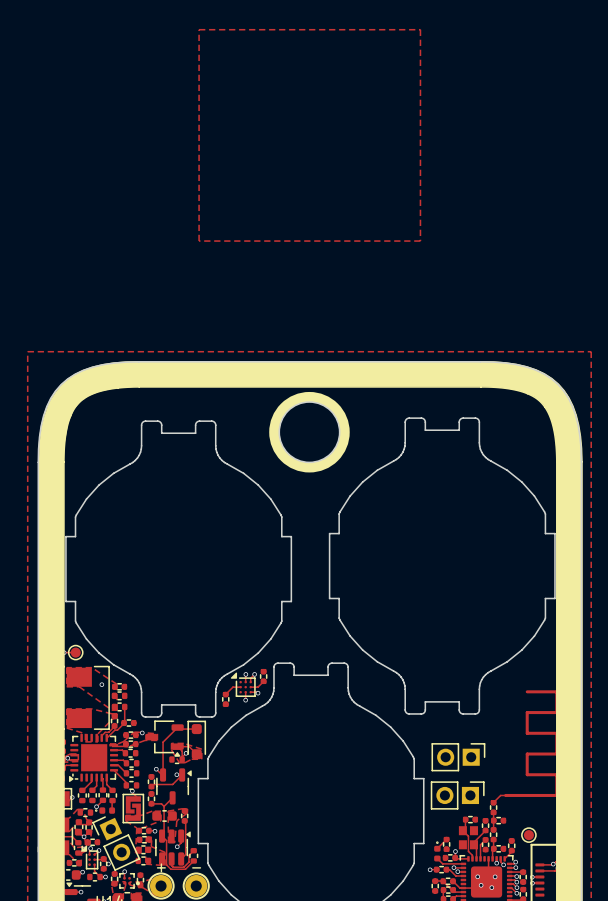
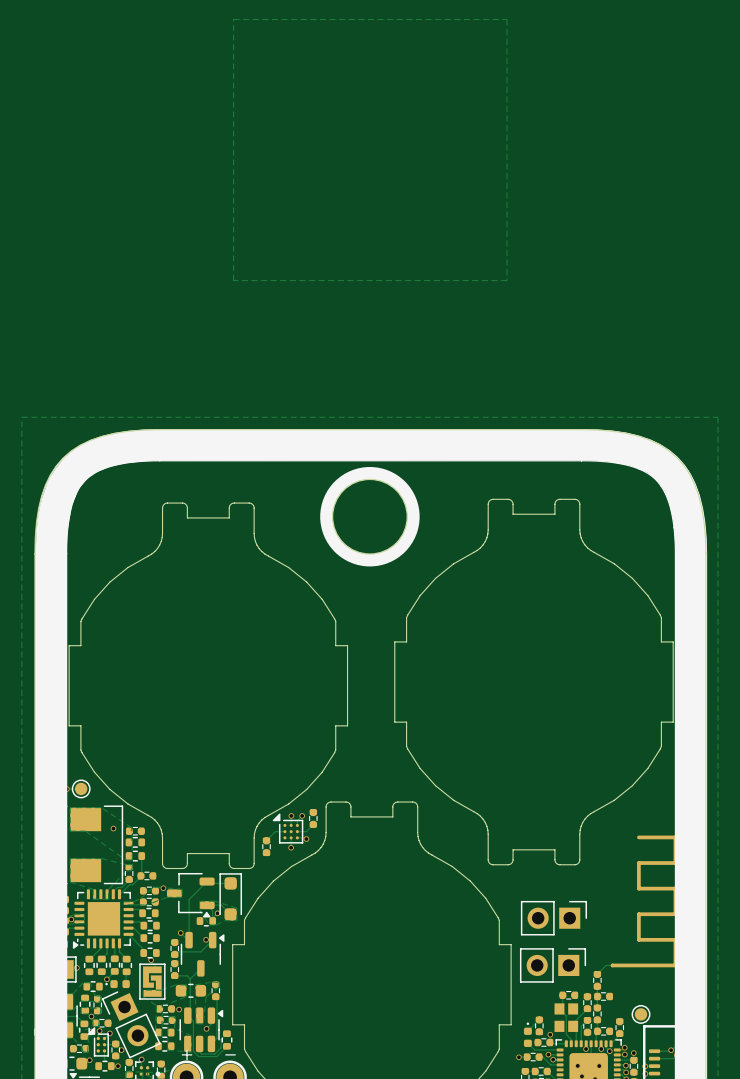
via: none -> (586, 1049)
via: none -> (633, 1053)

